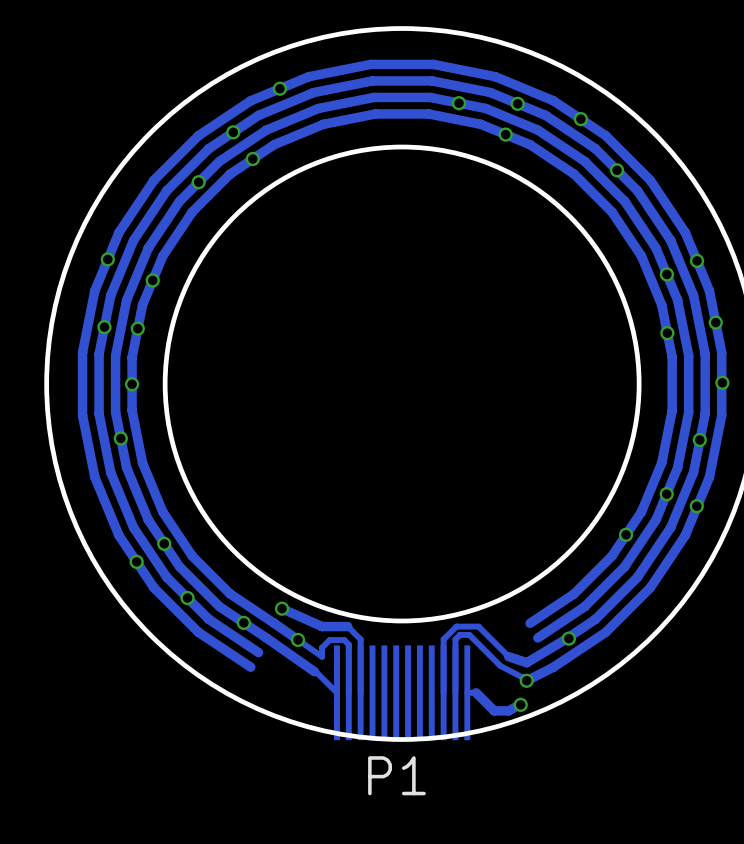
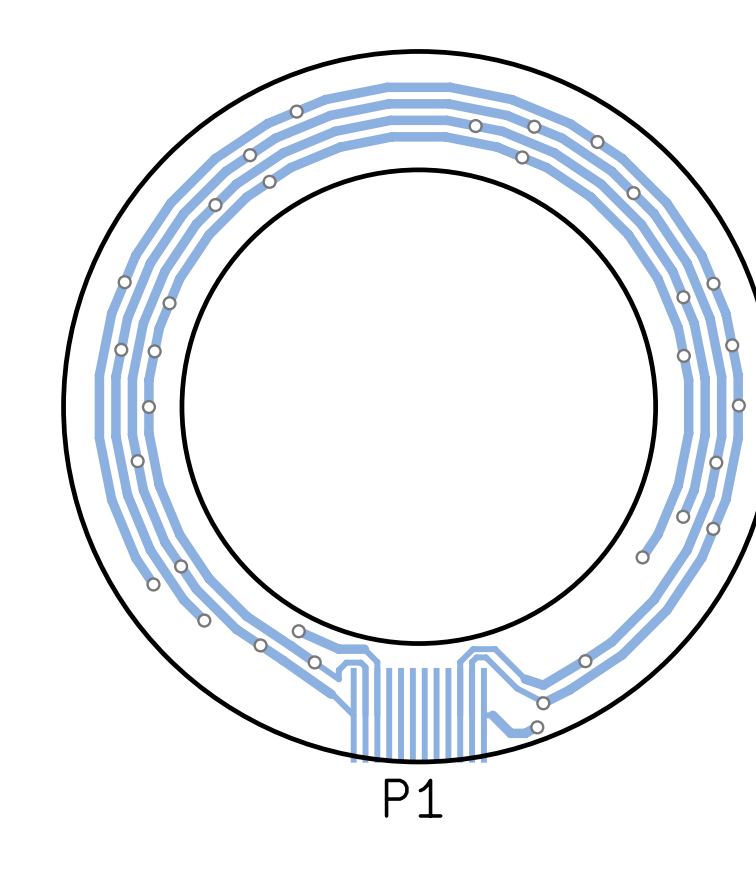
track: (666, 494) (656, 519) (624, 566) (584, 606) (537, 637) -> none
track: (626, 534) (611, 556) (574, 593) (530, 623) -> none
track: (136, 561) (153, 587) (198, 632) (250, 667) -> none
track: (187, 598) (208, 619) (258, 652) -> none

